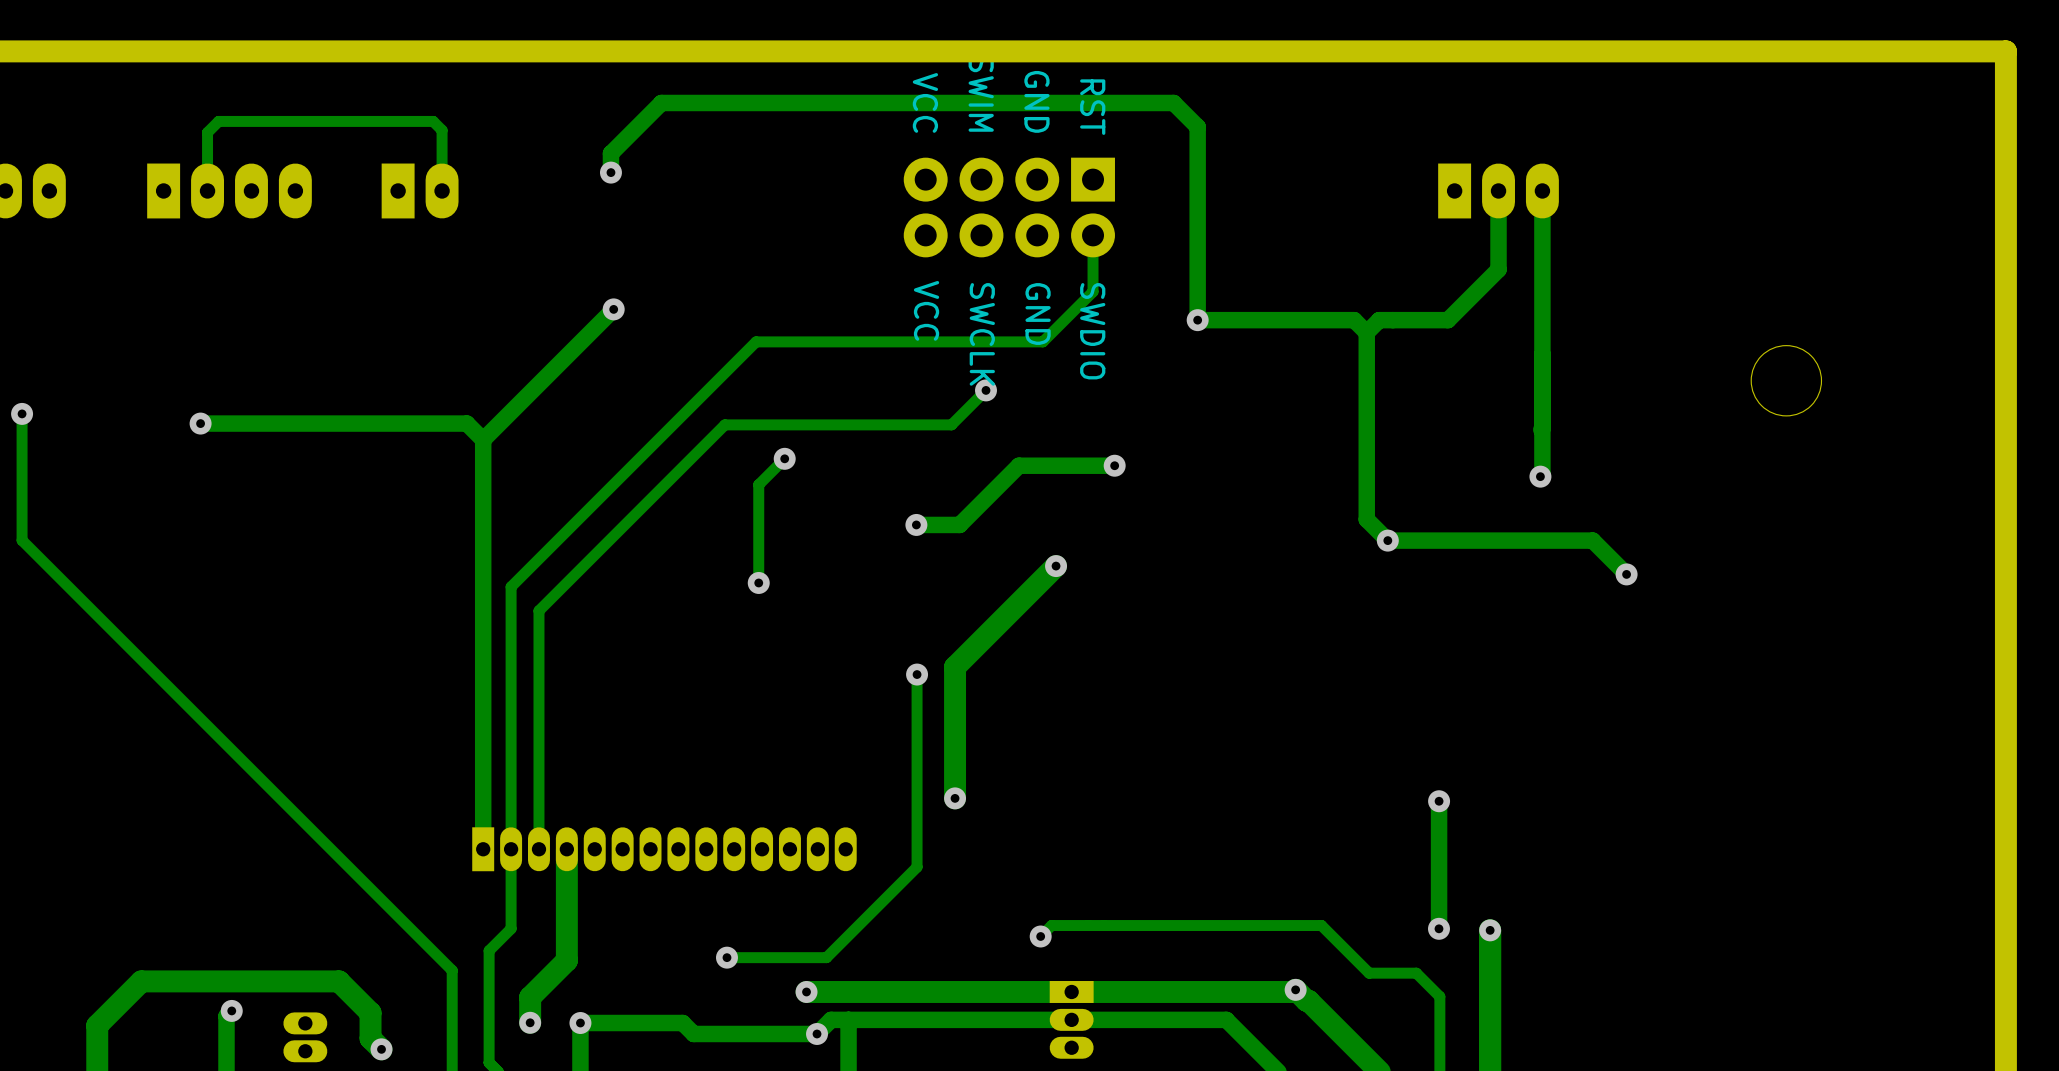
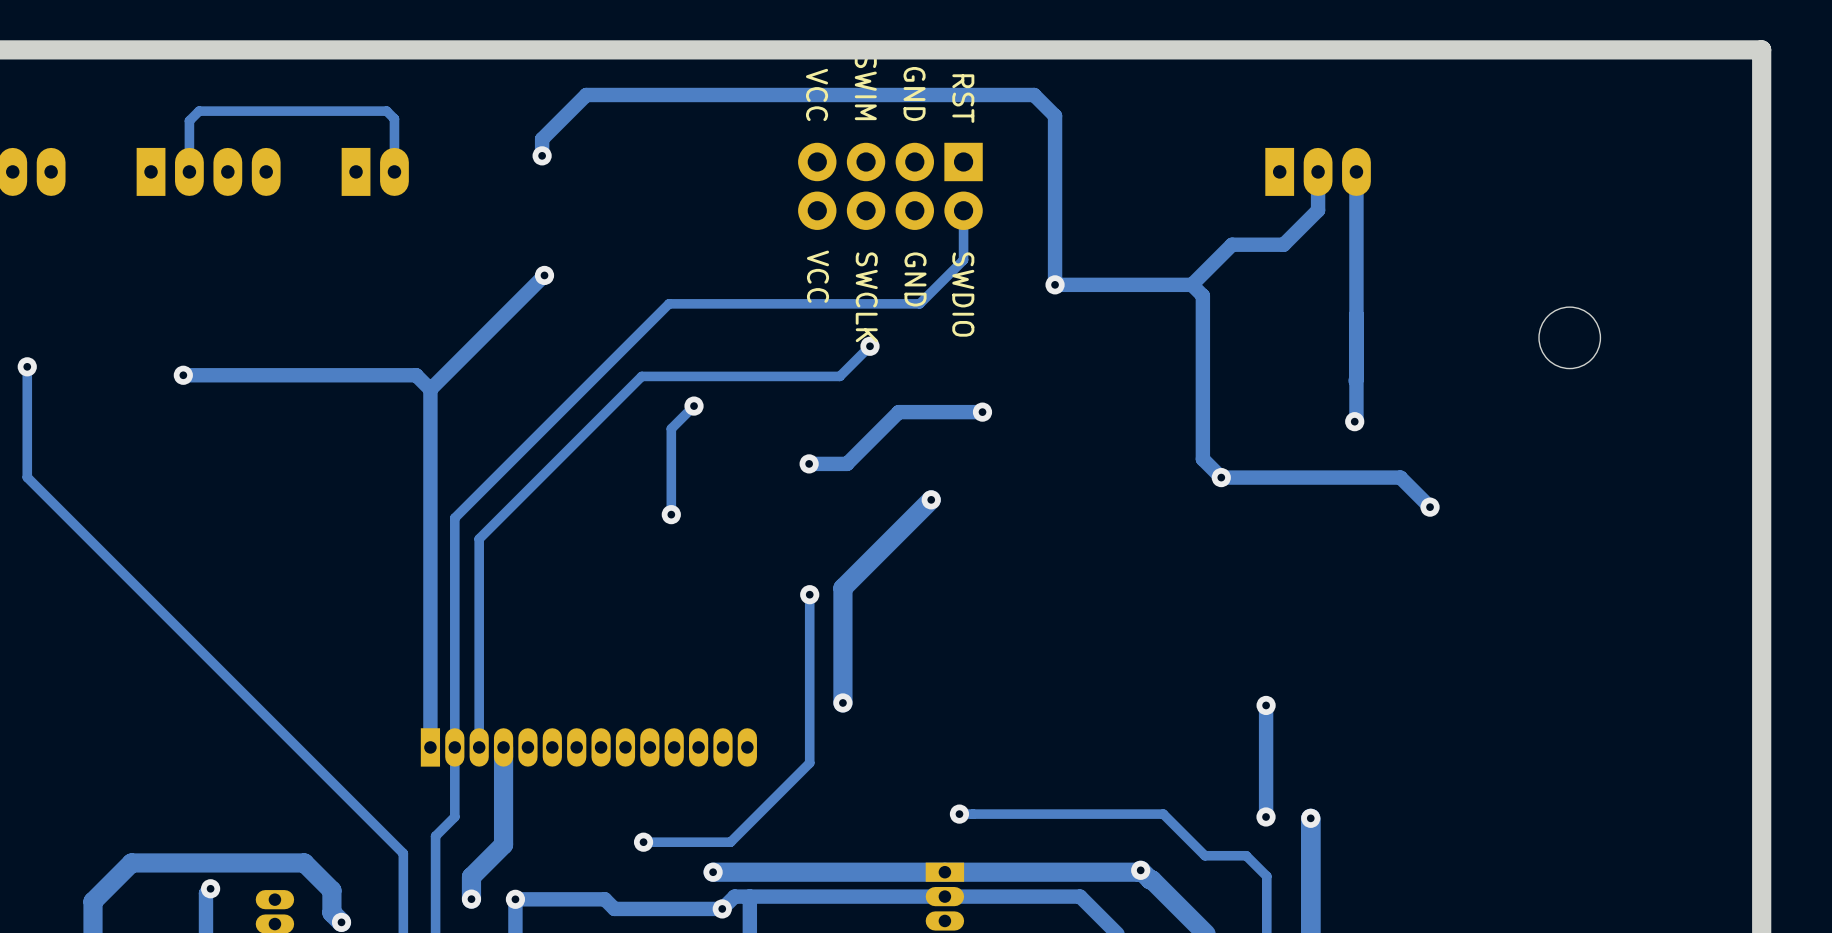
track: (1498, 234) (1498, 269) (1447, 320) (1379, 320) (1366, 332) -> (1318, 210) (1283, 244) (1232, 244) (1191, 284)
track: (1088, 925) (1051, 925) (1040, 936) -> none
via position: (1040, 936) -> (959, 814)

